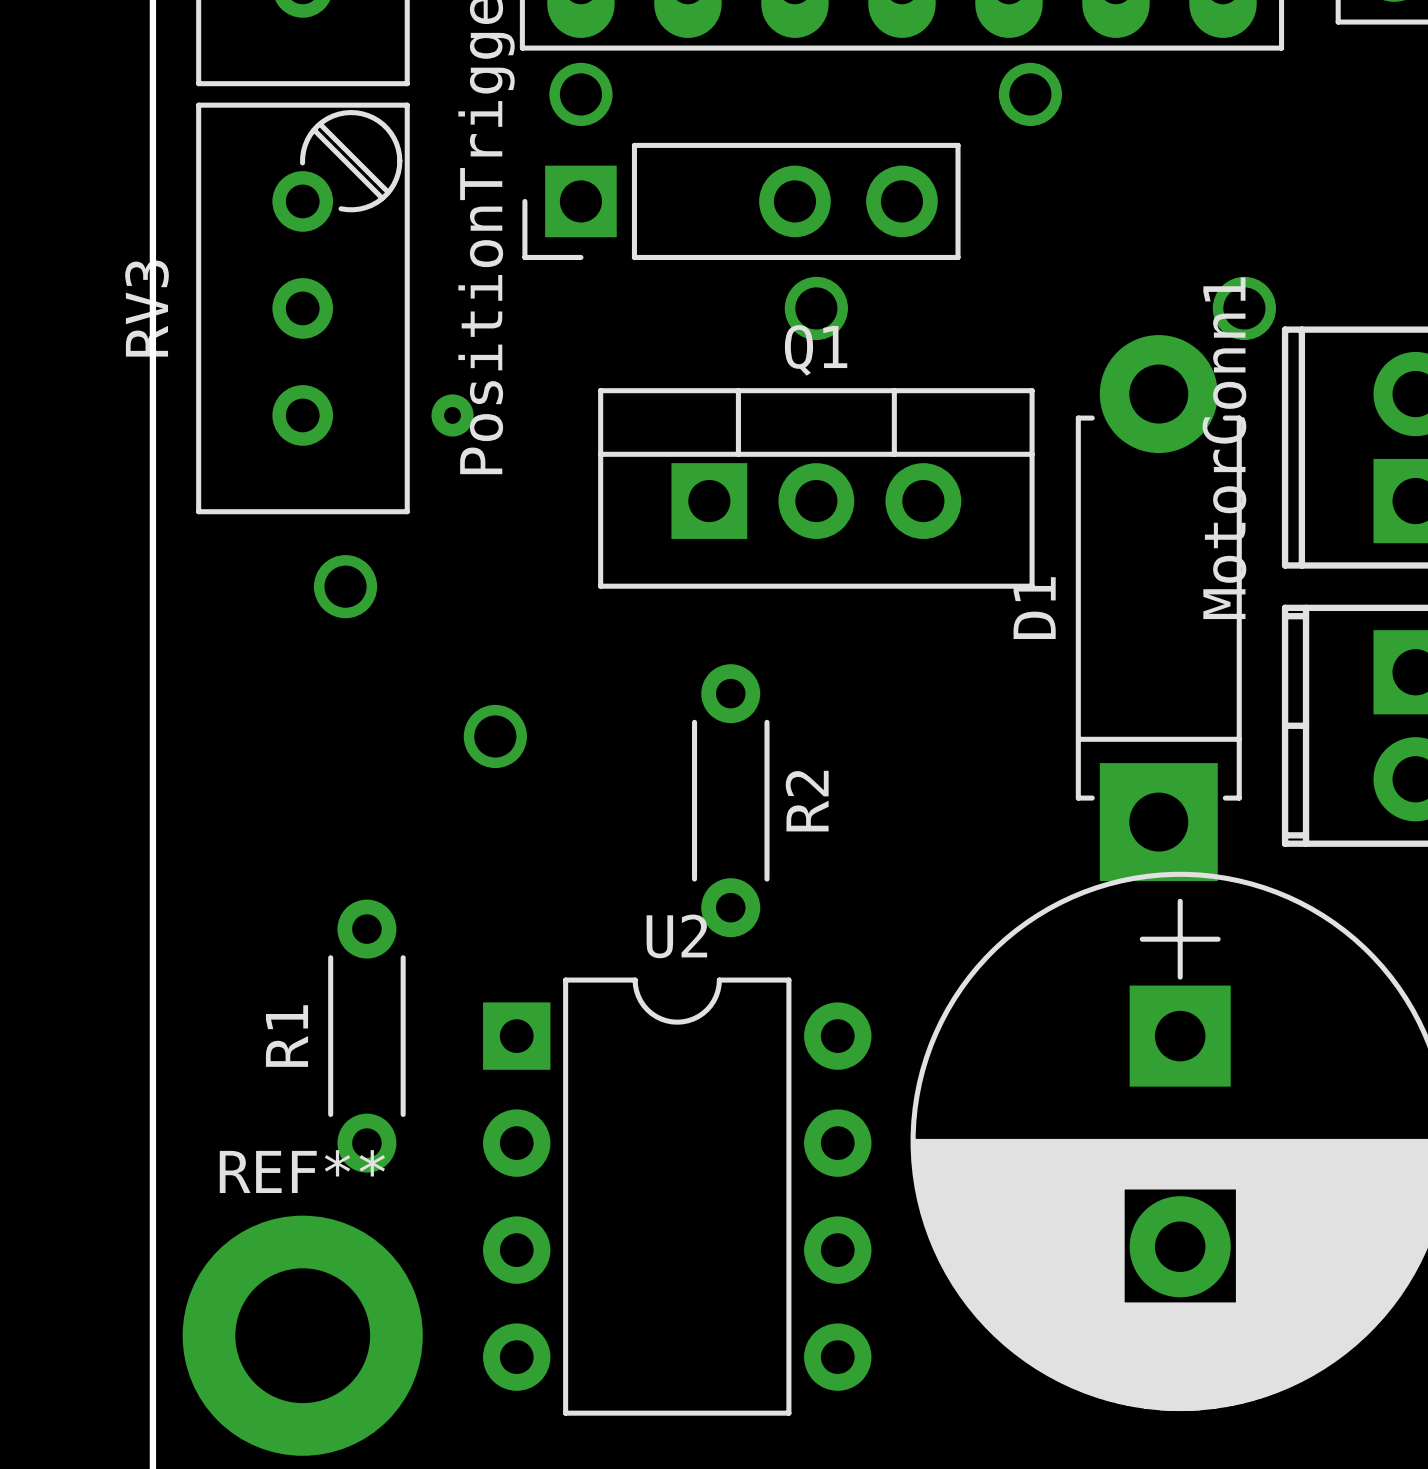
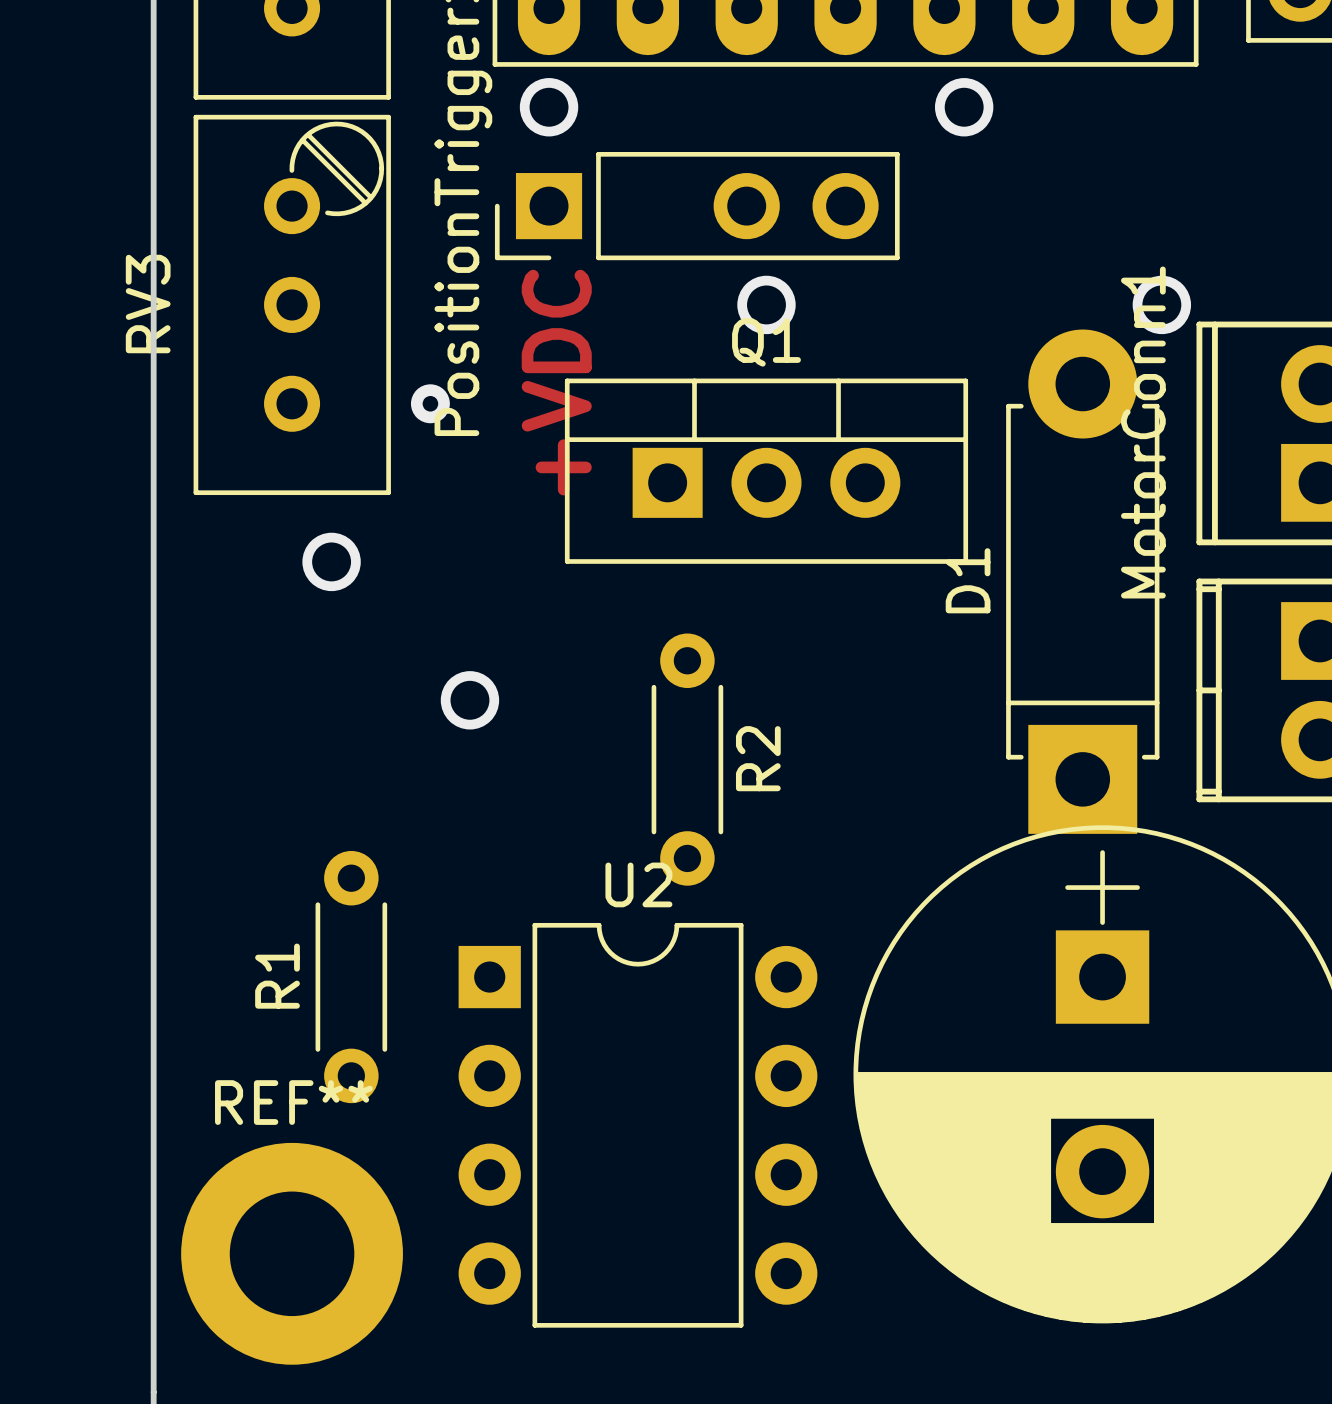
text: none -> +VDC (556, 382)

